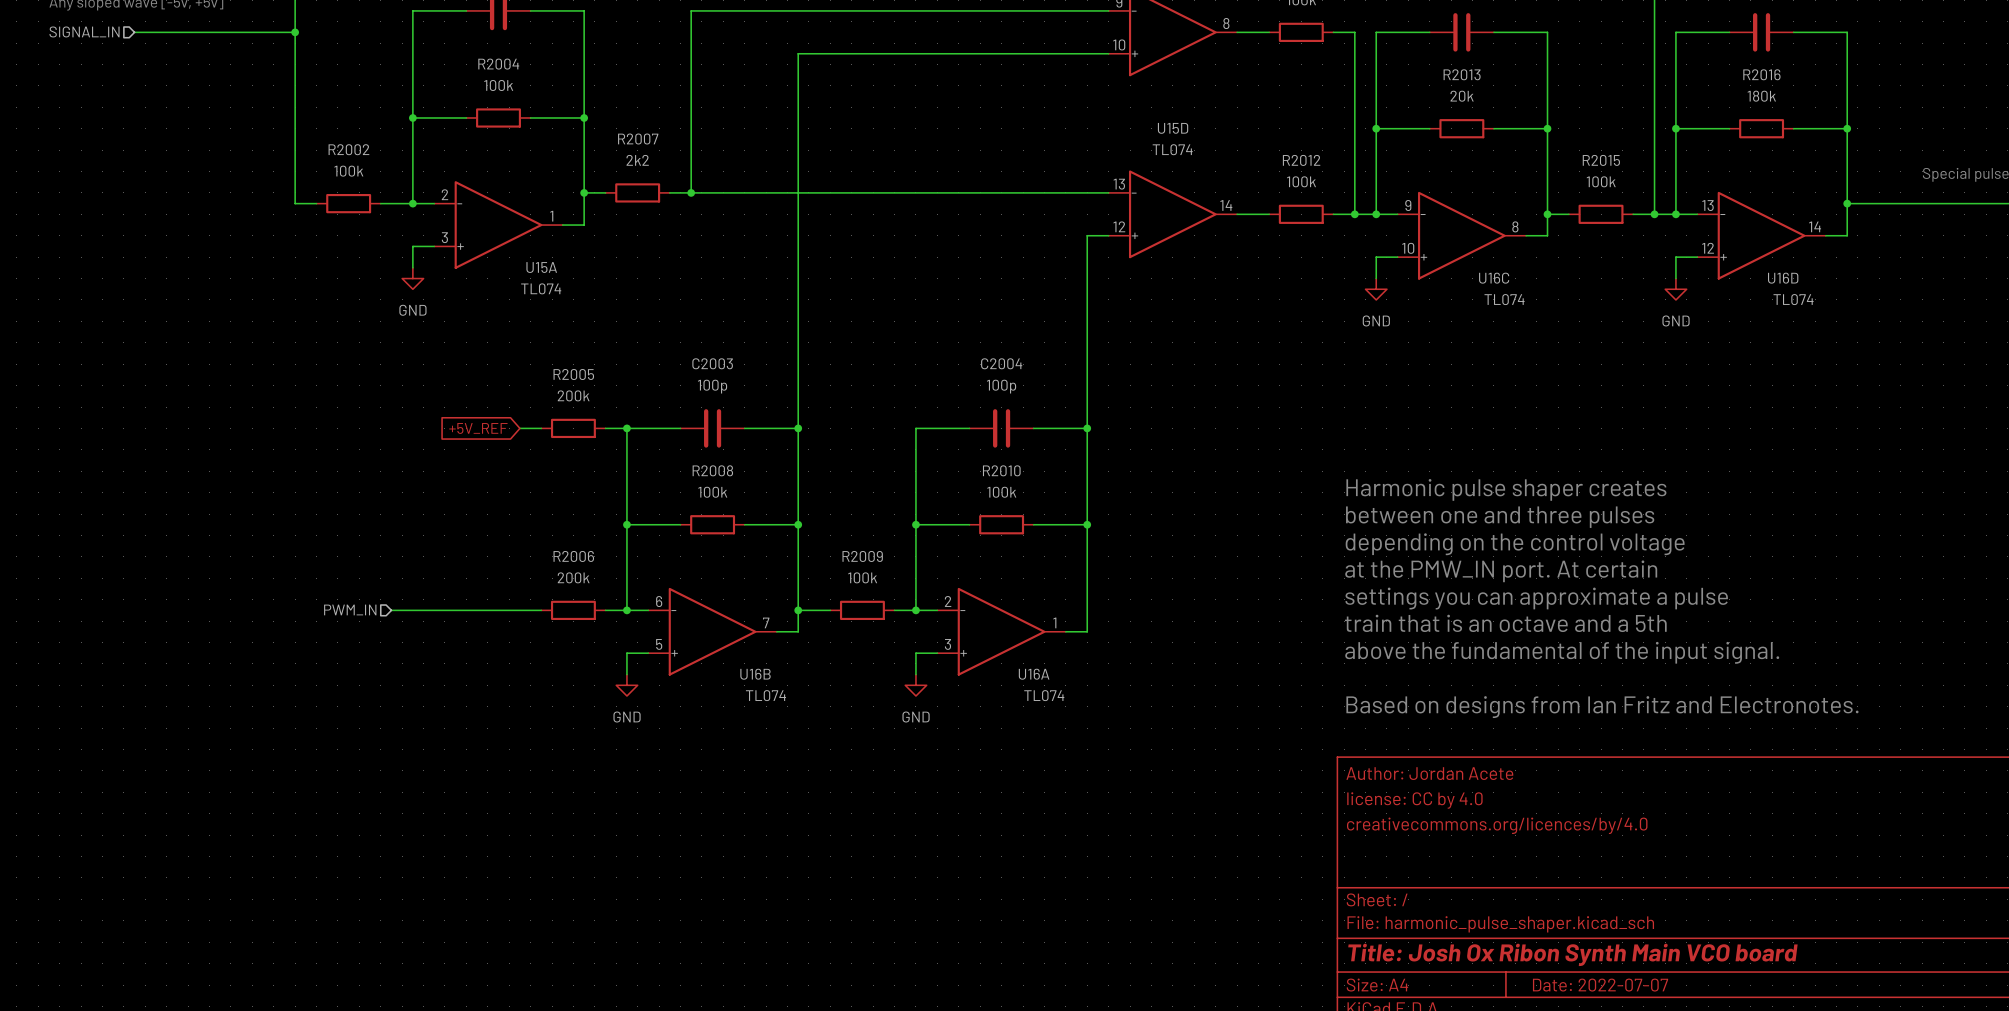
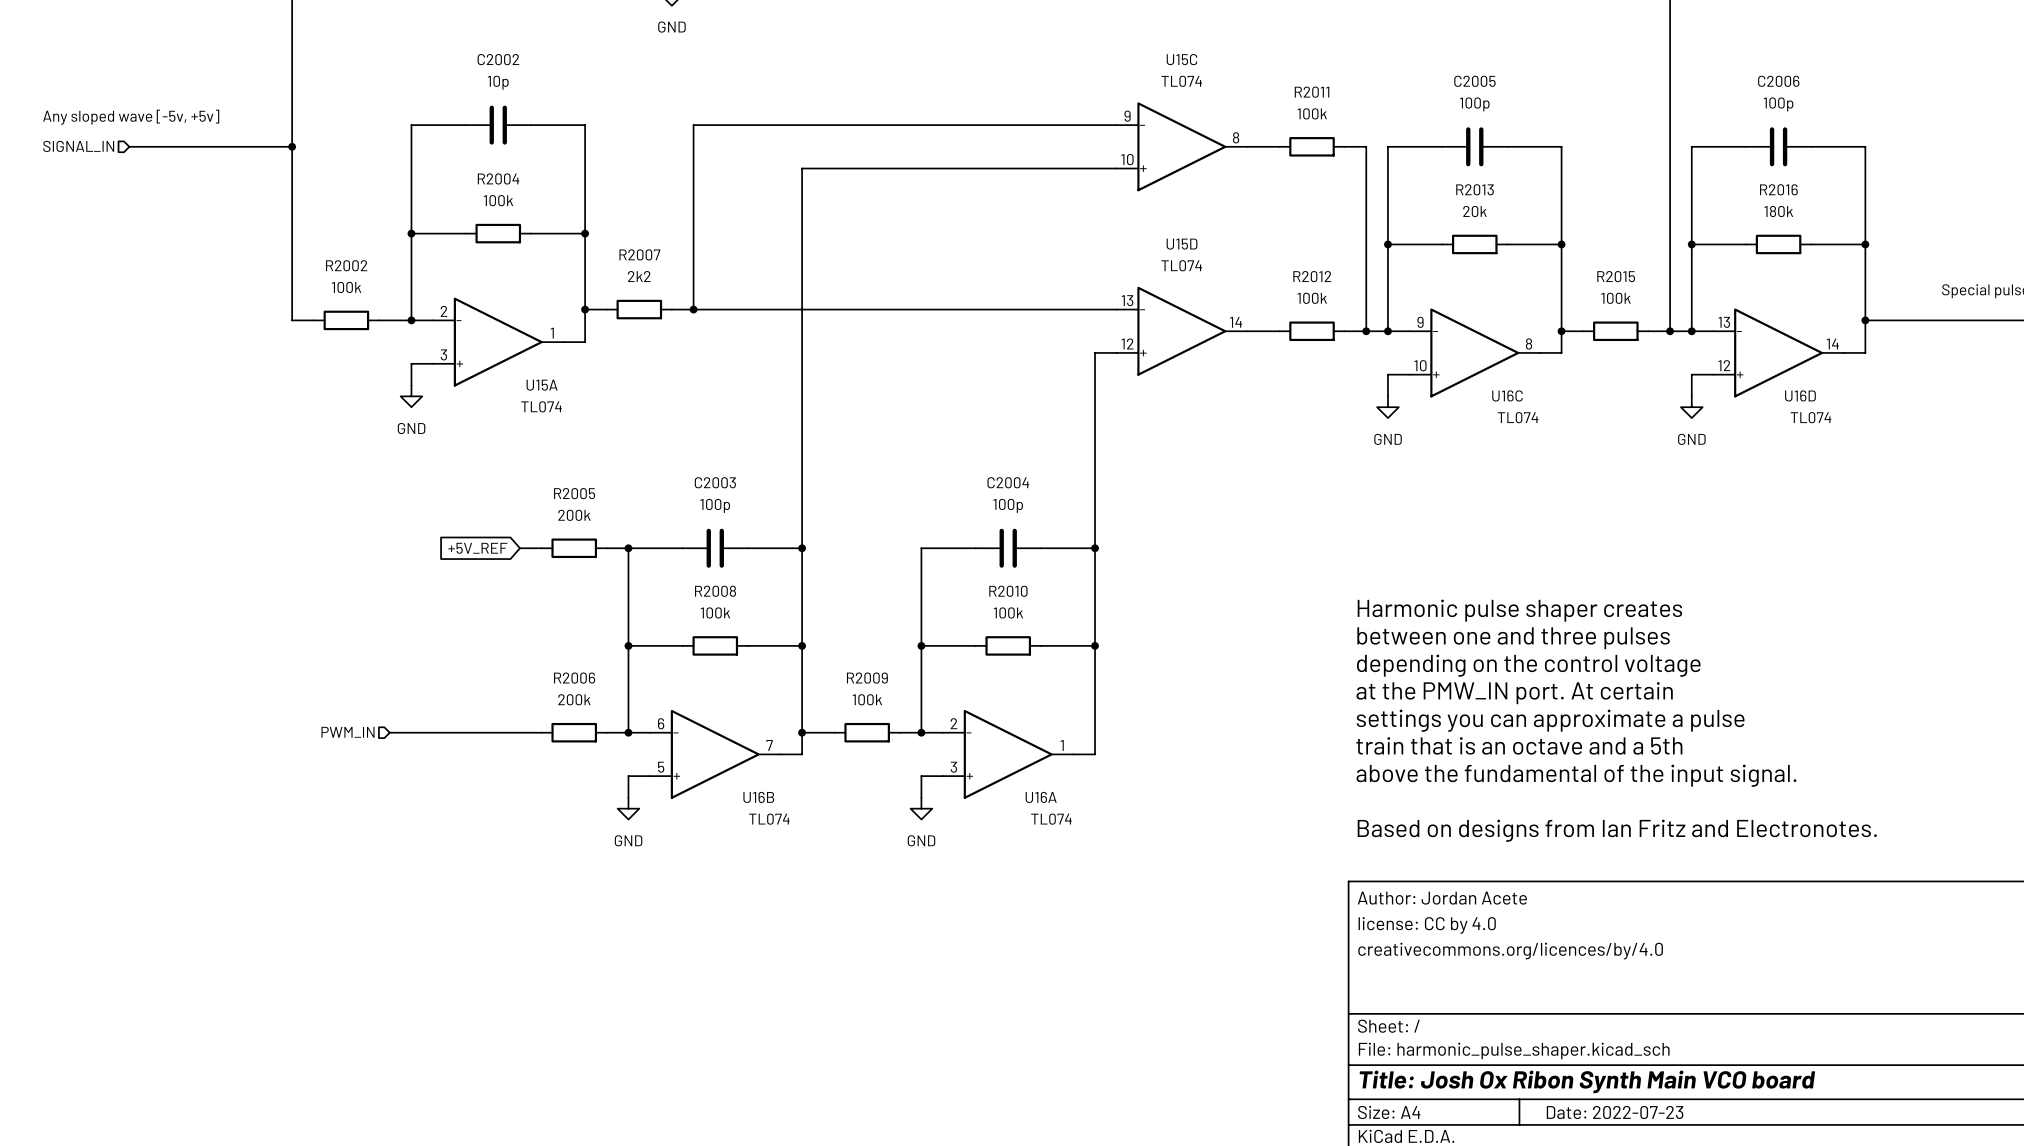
title block: Date: 2022-07-07 (1600, 985) -> Date: 2022-07-23 (1615, 1112)

